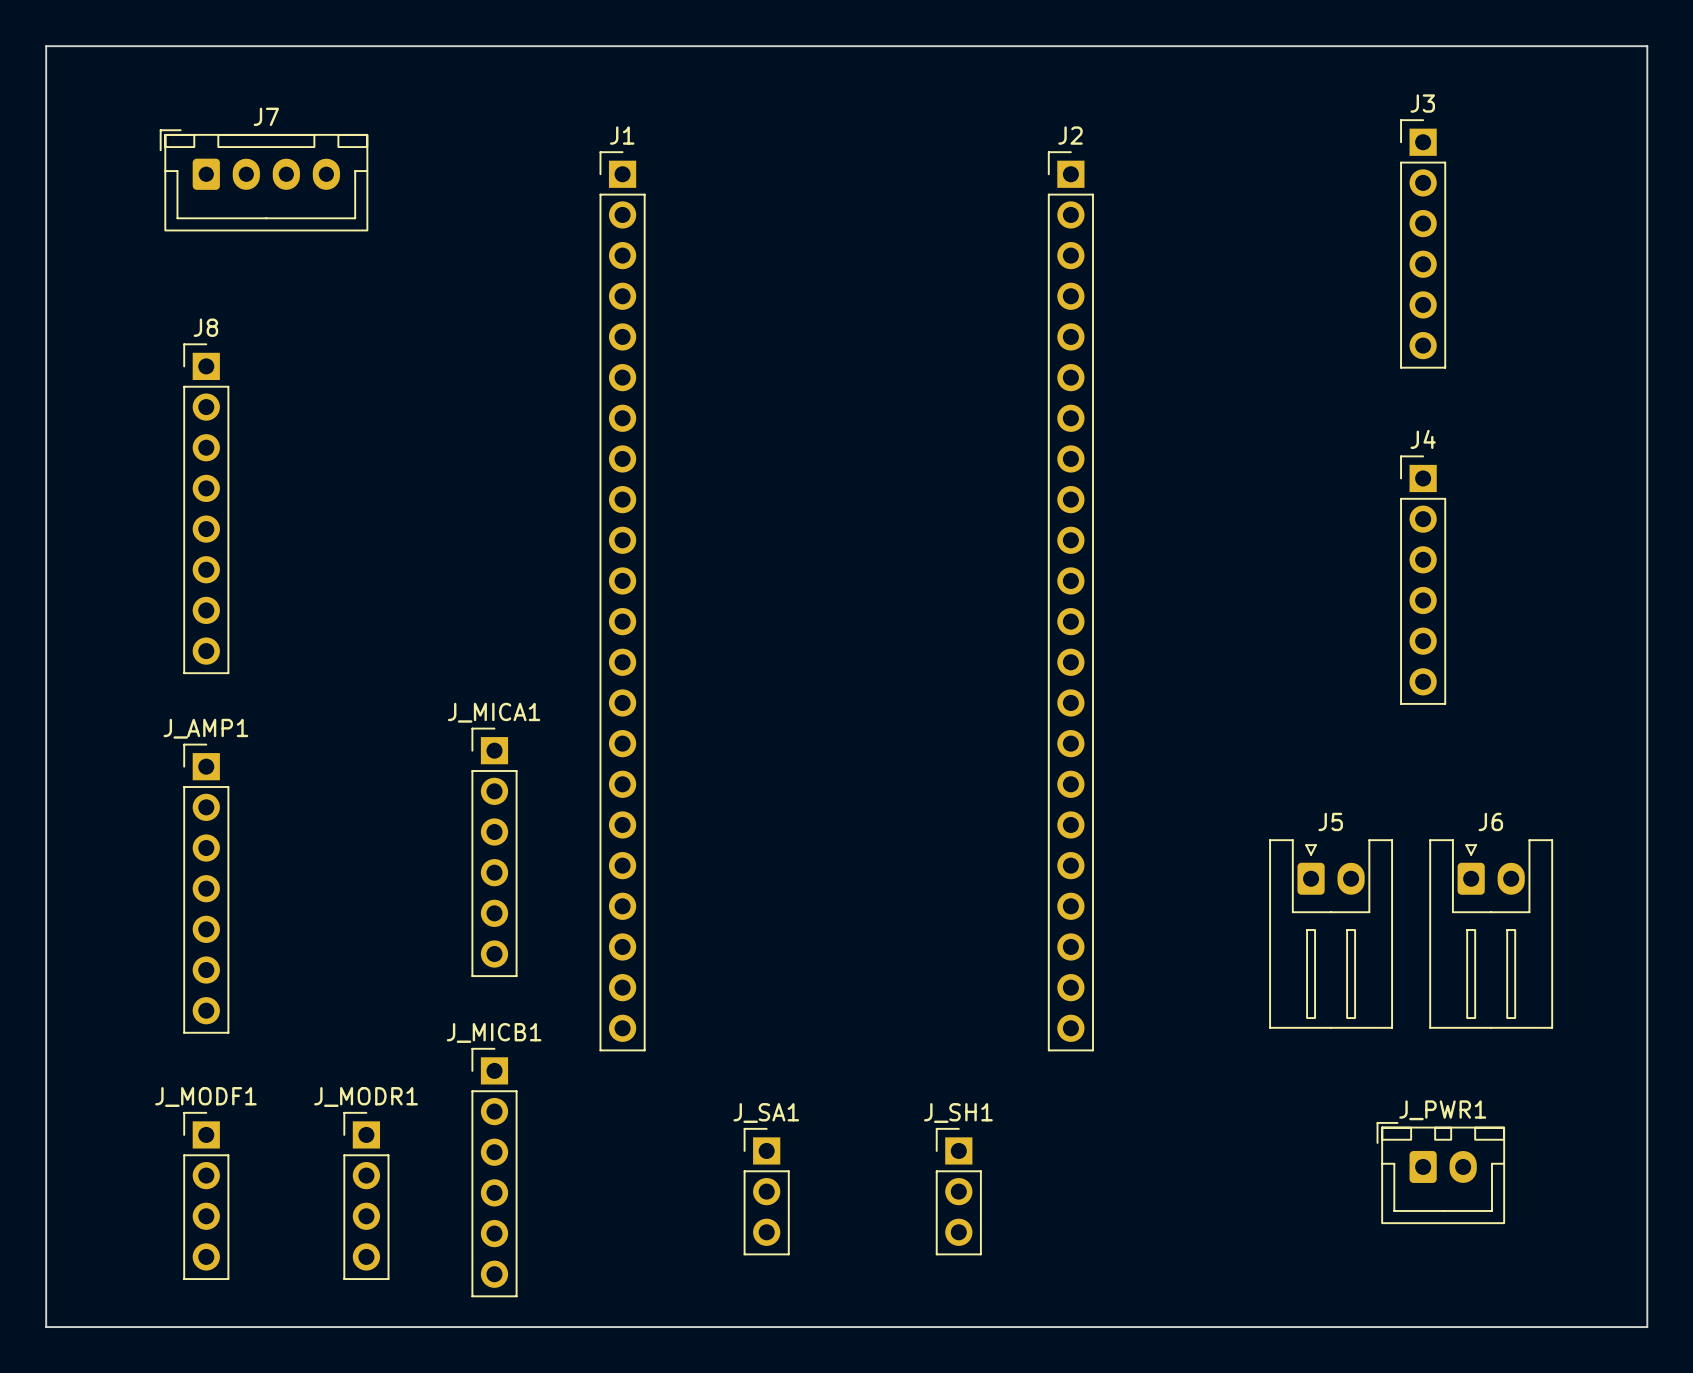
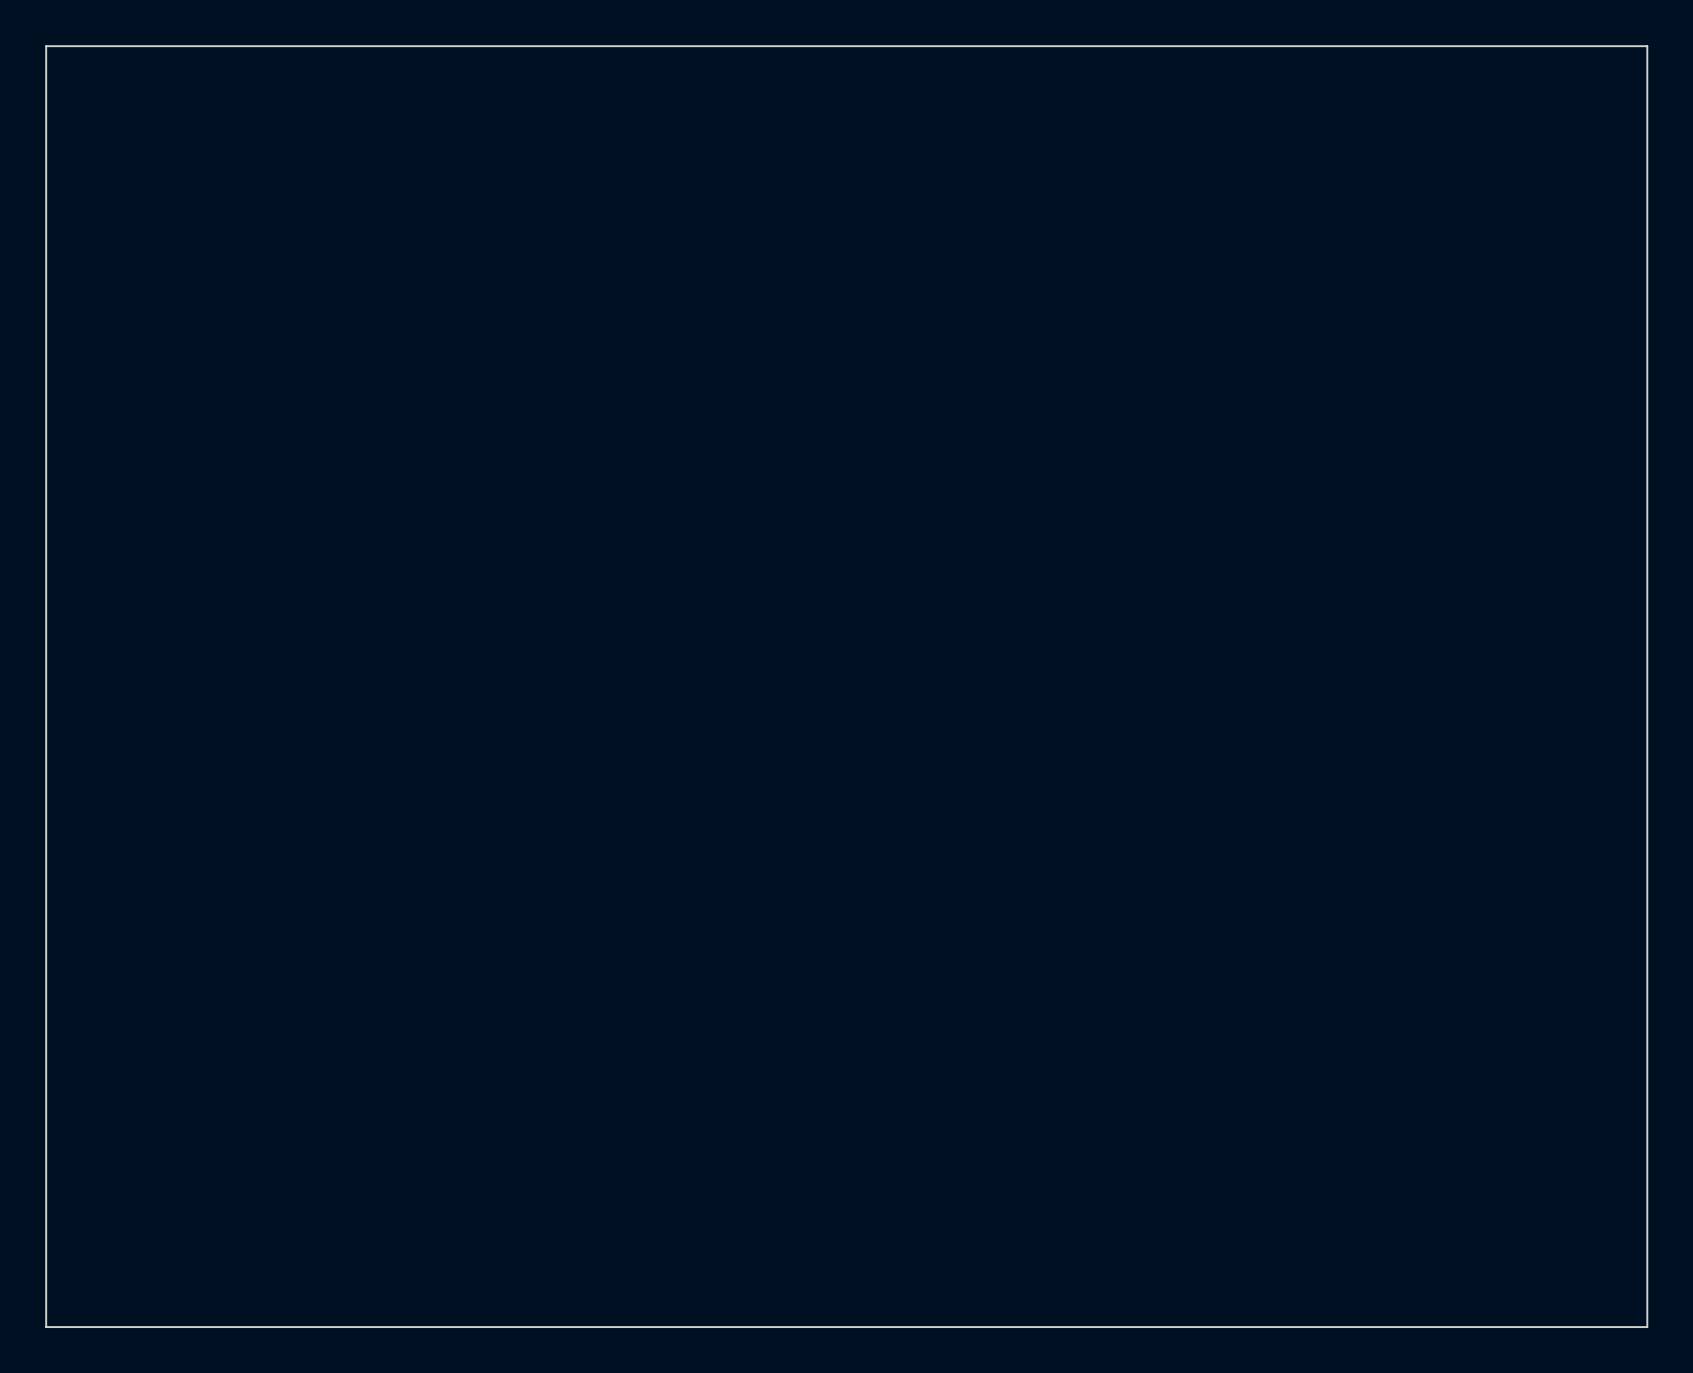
J7: (264, 180) -> none
J3: (1423, 243) -> none
J8: (206, 508) -> none
J4: (1423, 580) -> none
J1: (622, 601) -> none
J2: (1070, 601) -> none
J_MICA1: (494, 852) -> none
J_AMP1: (206, 888) -> none
J5: (1331, 934) -> none
J6: (1491, 934) -> none
J_MICB1: (494, 1172) -> none
J_PWR1: (1440, 1173) -> none
J_SA1: (766, 1191) -> none
J_SH1: (958, 1191) -> none
J_MODF1: (206, 1195) -> none
J_MODR1: (366, 1195) -> none

